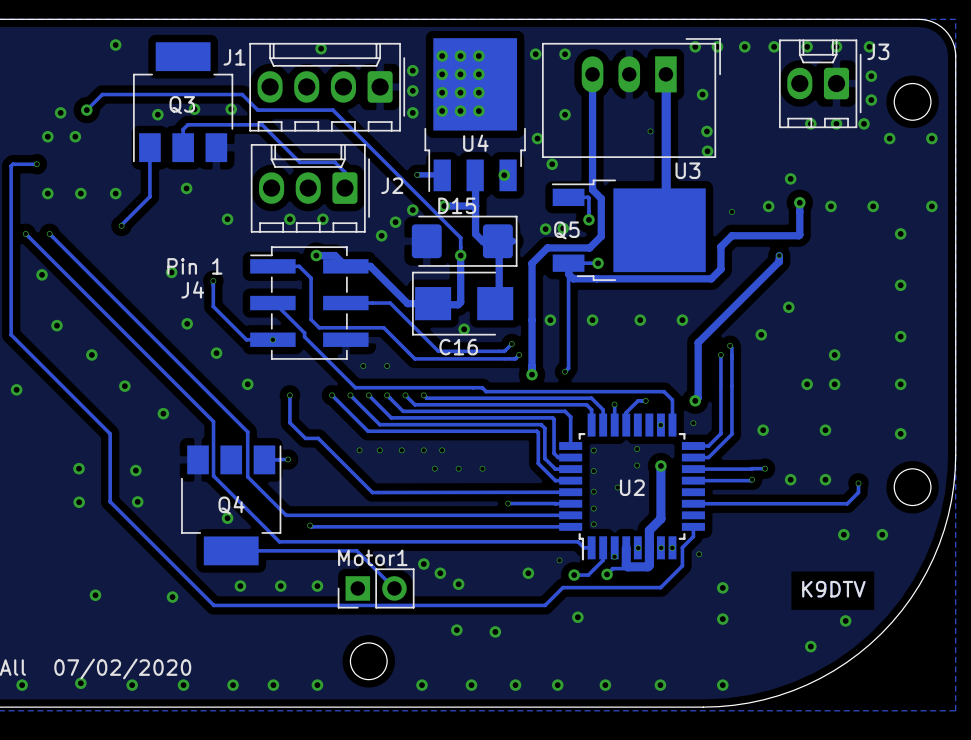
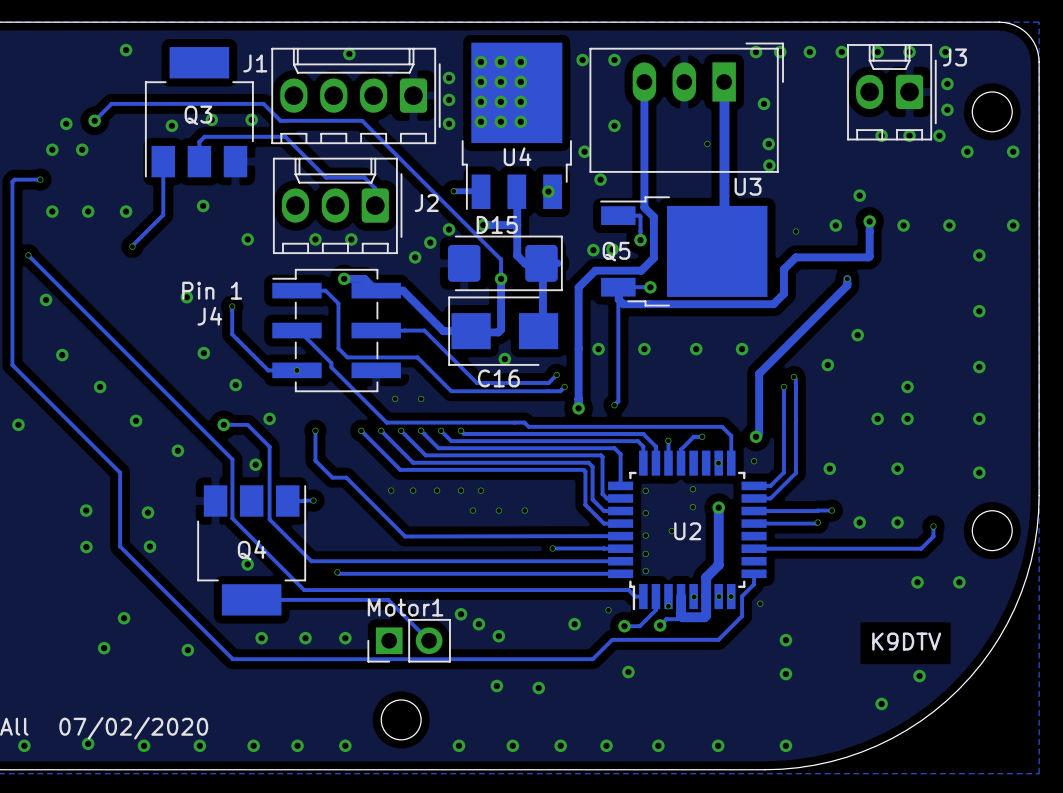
track: (49, 233) (247, 432) -> (223, 424) (247, 424) (269, 446) (269, 470)
via: (49, 233) -> none
via: none -> (223, 424)
via: none -> (255, 464)
via: none -> (124, 618)

